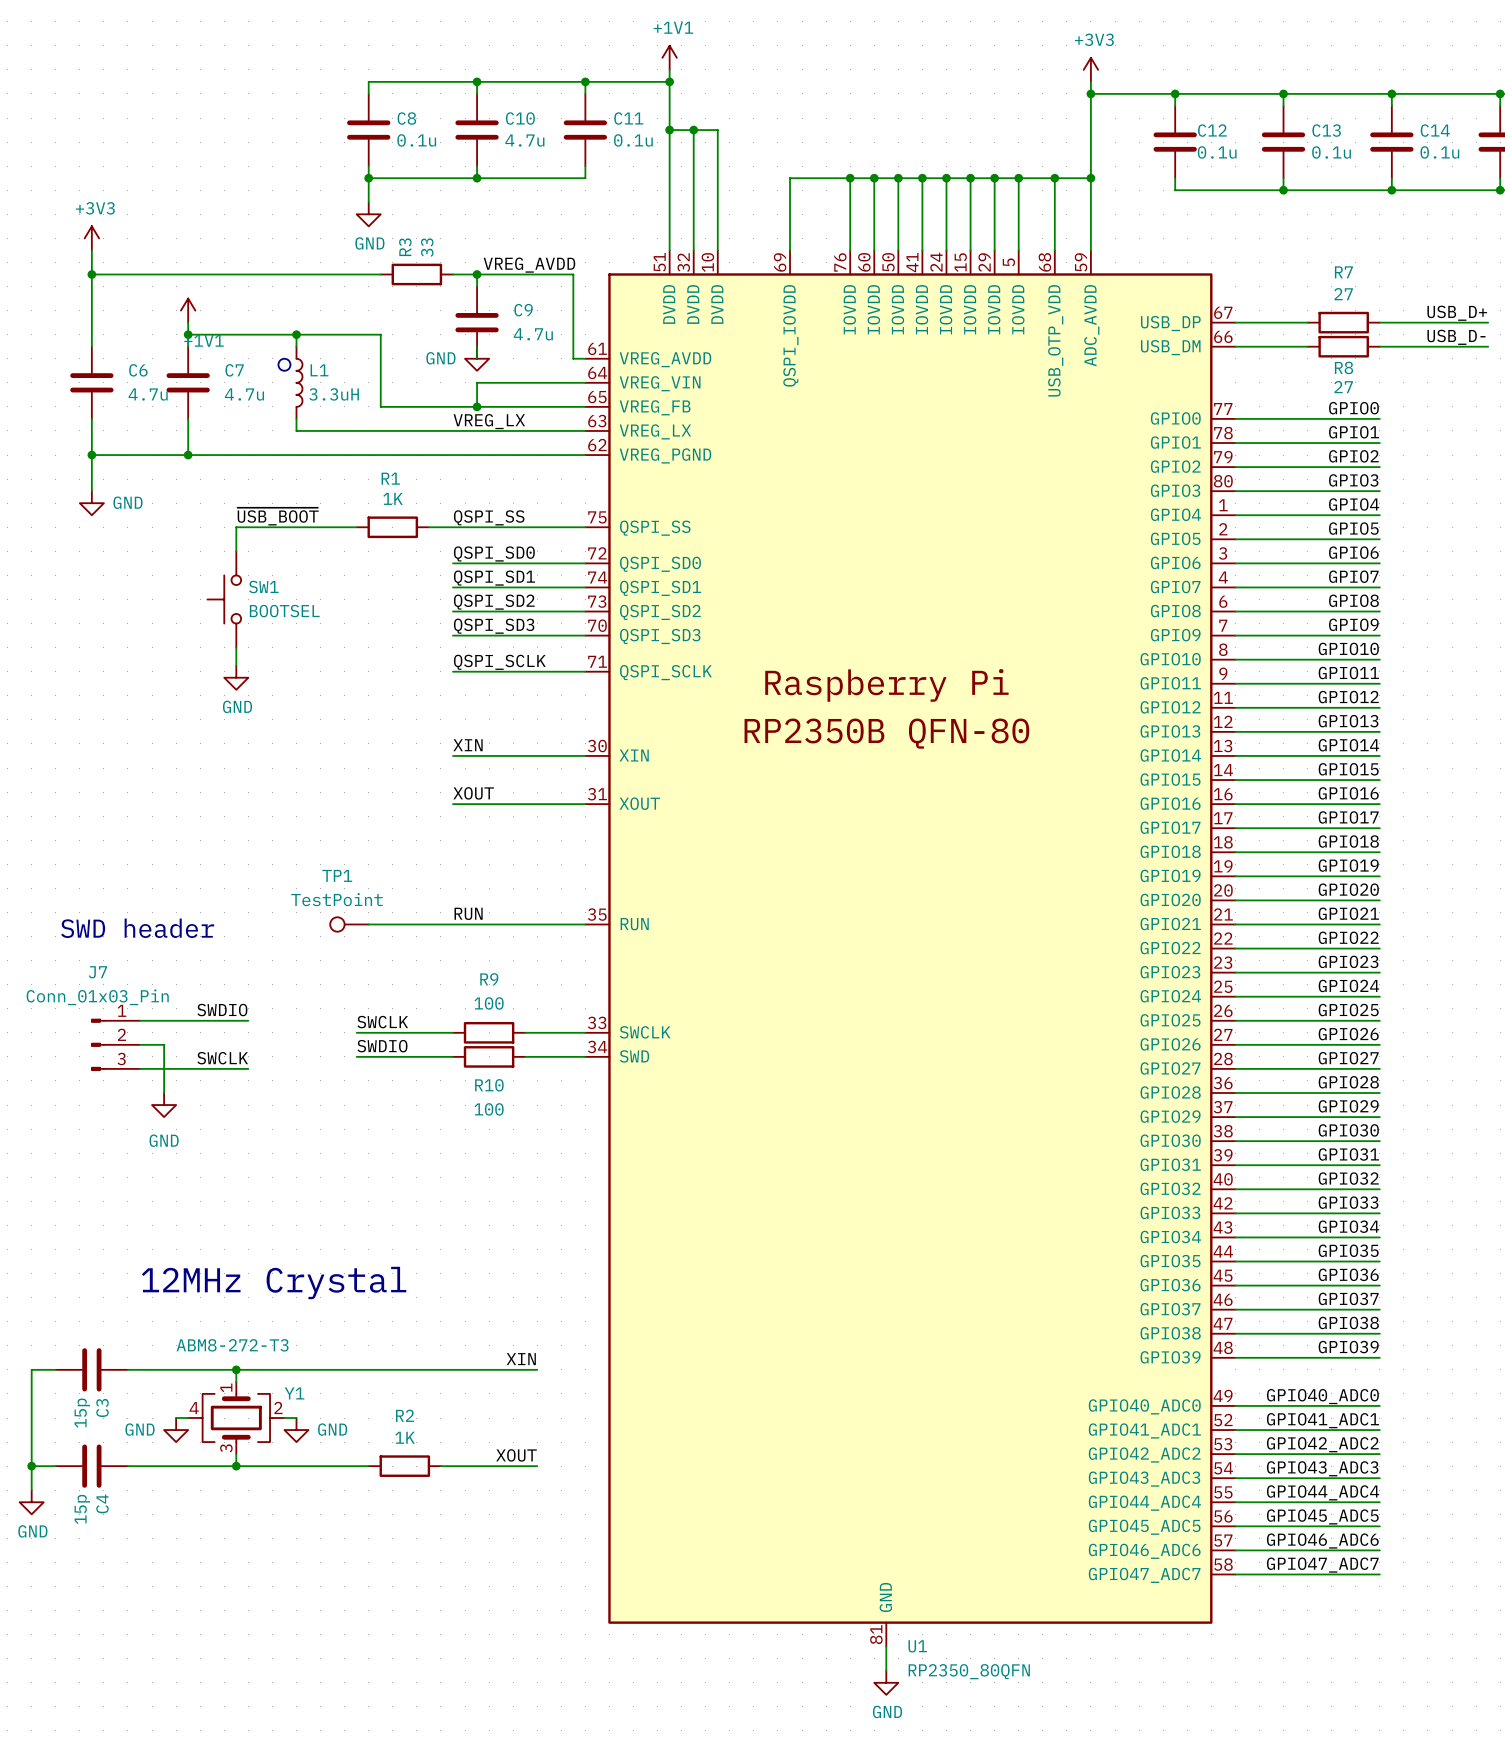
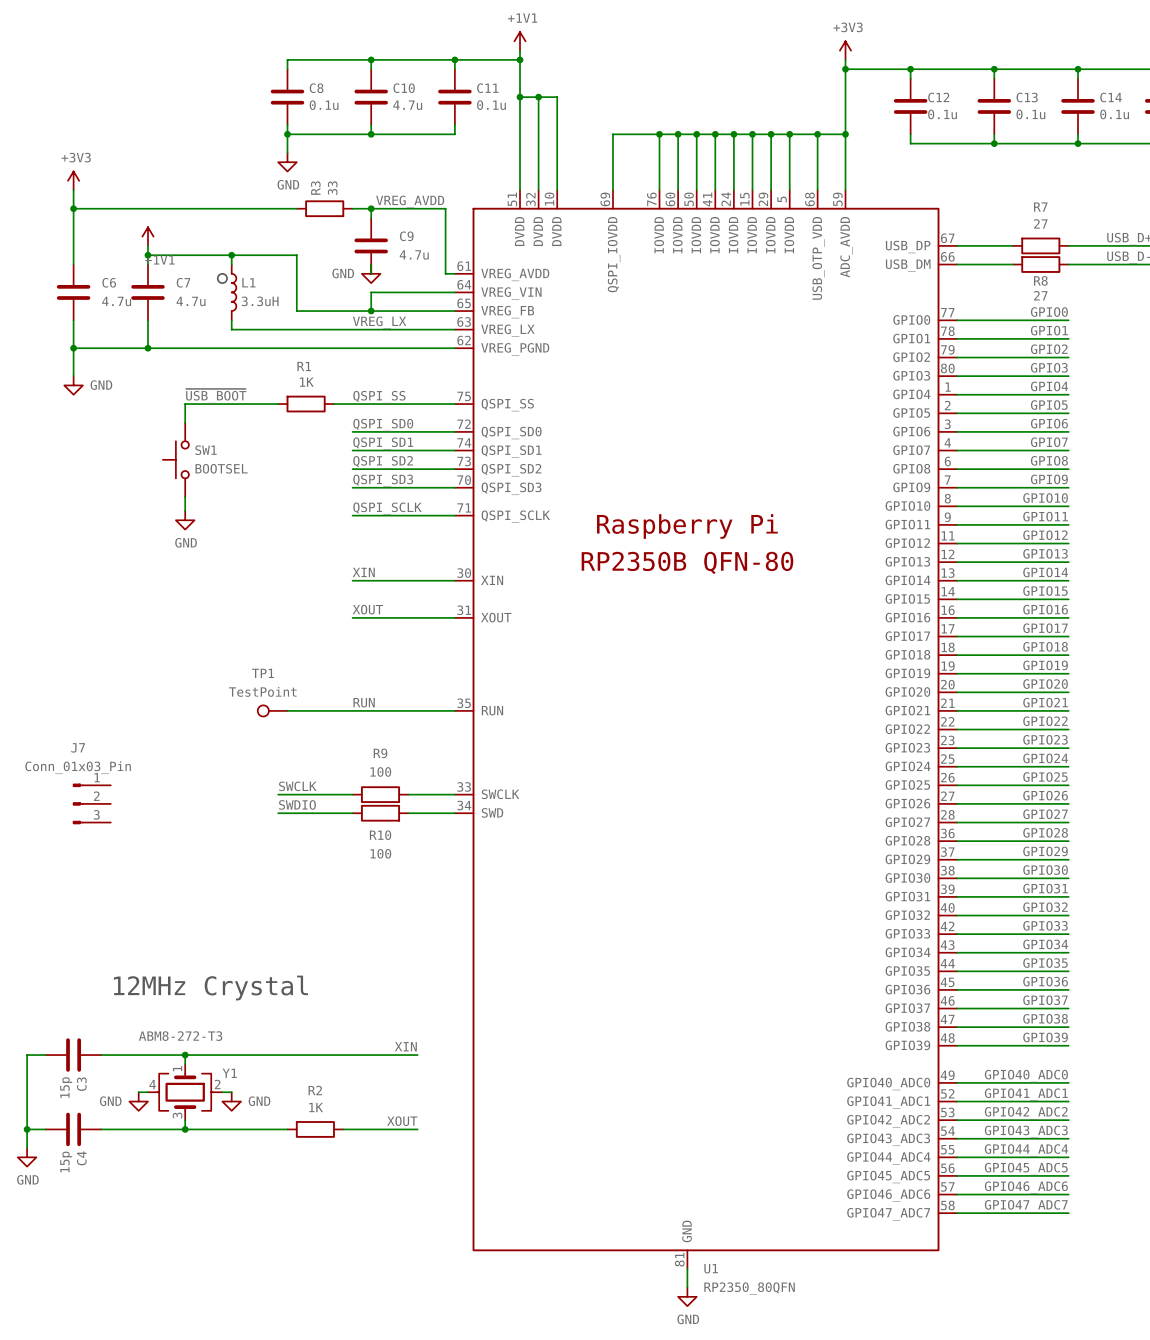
text: SWD header (137, 928) -> none
label: SWDIO (222, 1010) -> none
wire: (140, 1020) (248, 1020) -> none
wire: (140, 1044) (164, 1044) (164, 1093) -> none
label: SWCLK (222, 1058) -> none
wire: (140, 1068) (248, 1068) -> none
power symbol: GND (164, 1105) -> none

